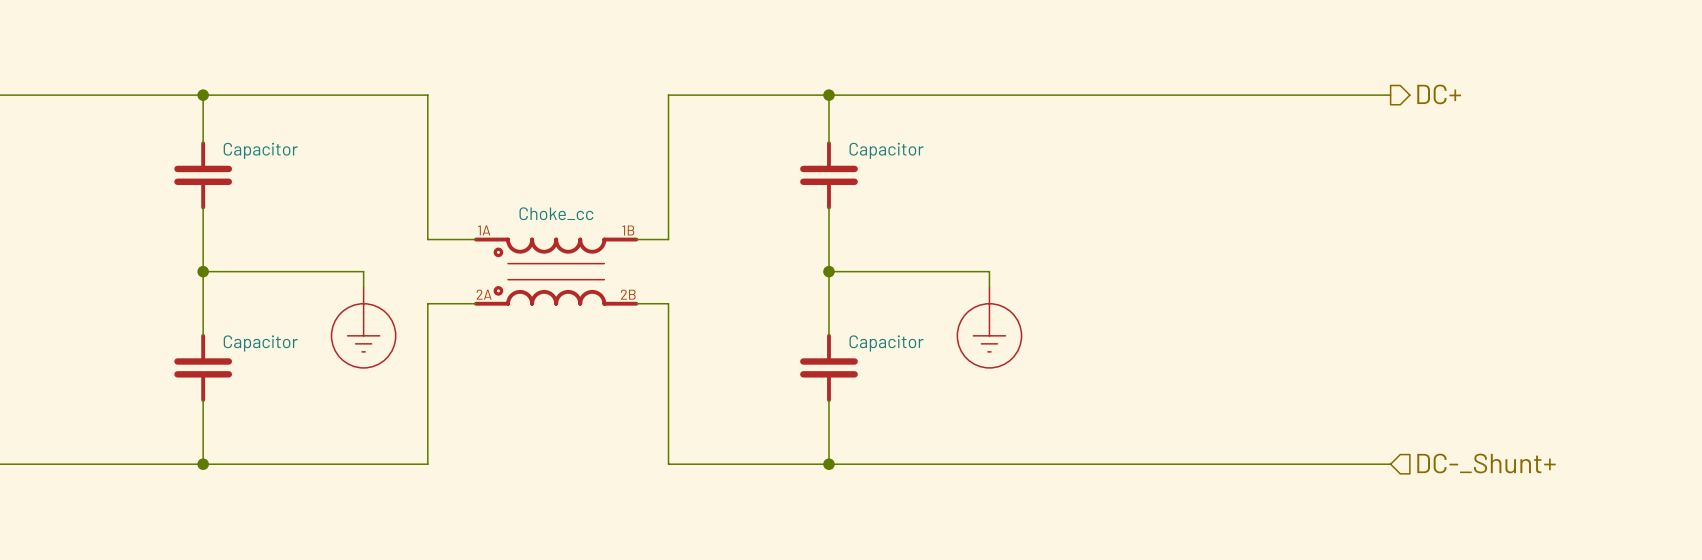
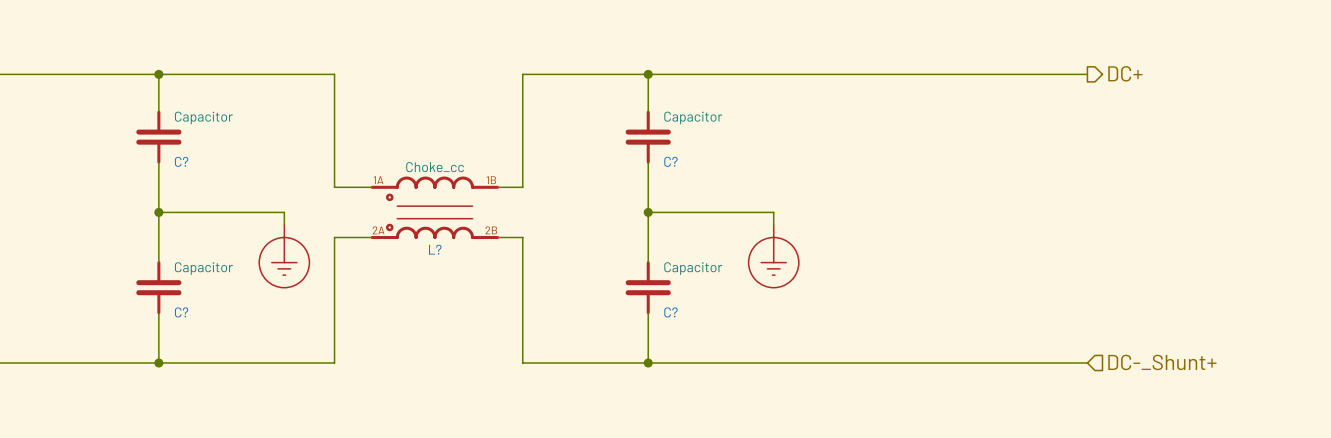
C? name: none -> C? (181, 161)
C? name: none -> C? (670, 161)
L?: none -> Choke_cc (434, 207)
part: Choke_cc (556, 271) -> none
C? name: none -> C? (181, 312)
C? name: none -> C? (670, 312)

